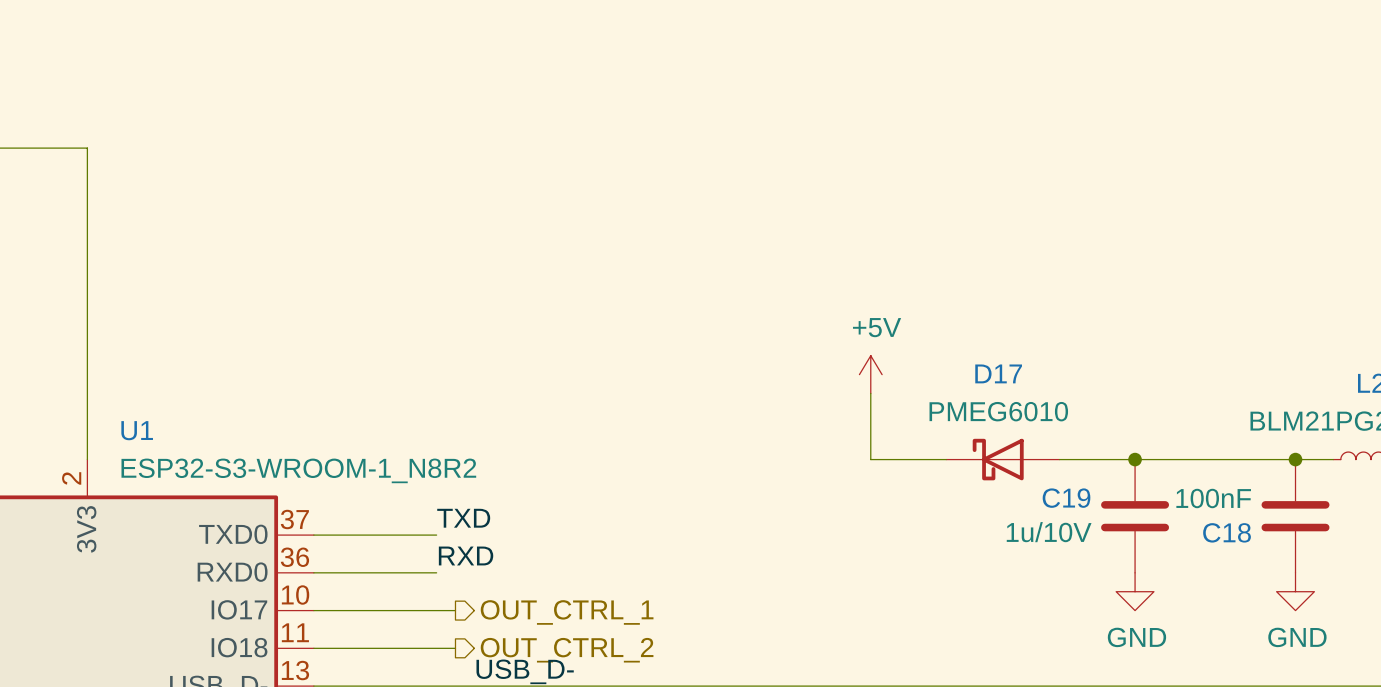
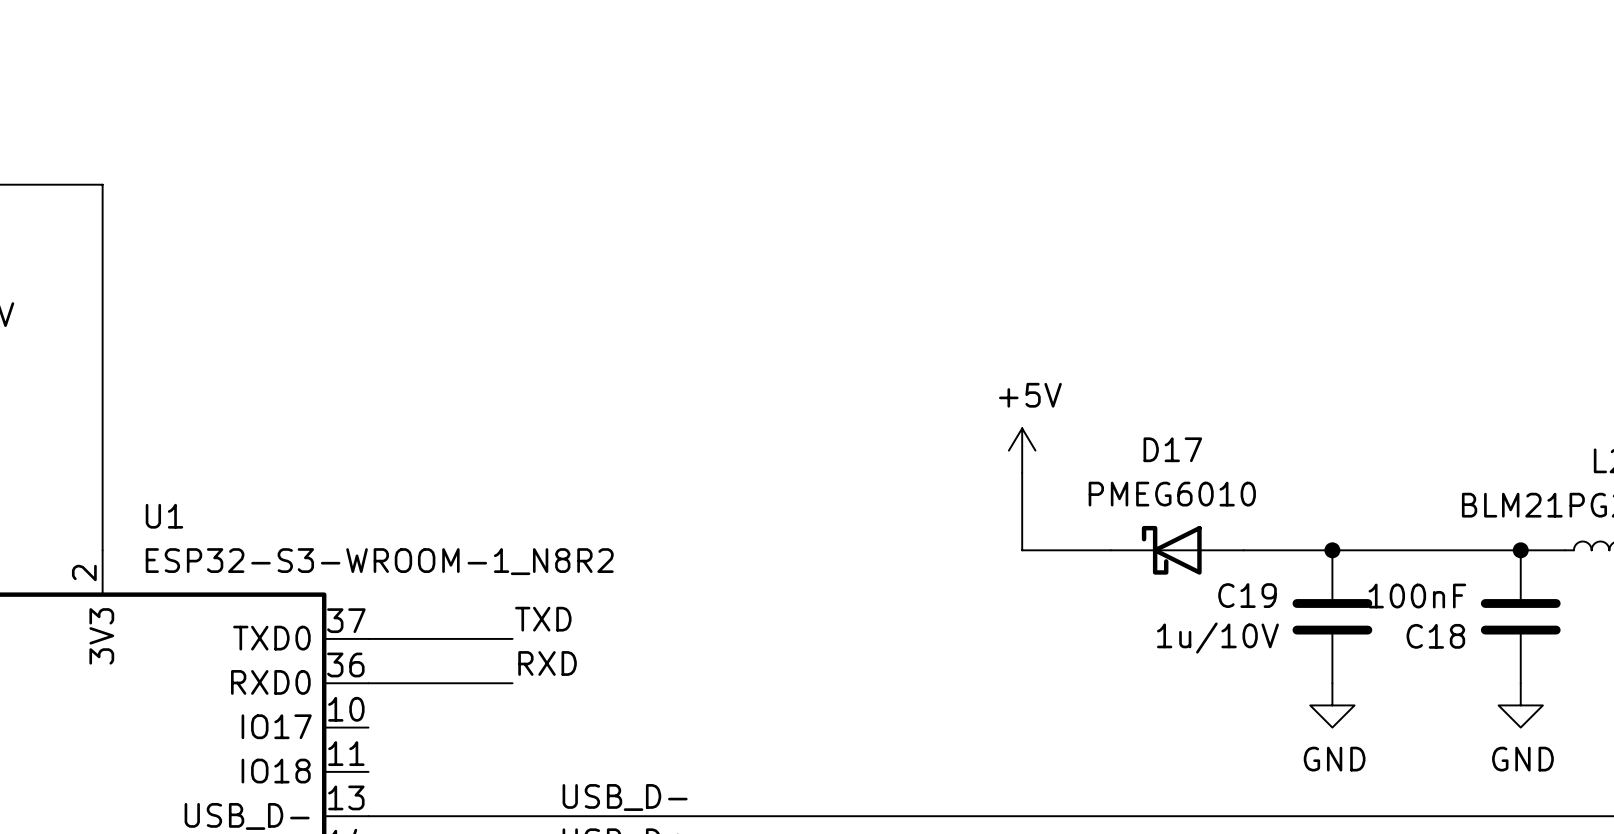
wire: (313, 610) (455, 610) -> none
hierarchical label: OUT_CTRL_1 (567, 612) -> none
wire: (313, 648) (455, 648) -> none
hierarchical label: OUT_CTRL_2 (567, 650) -> none

